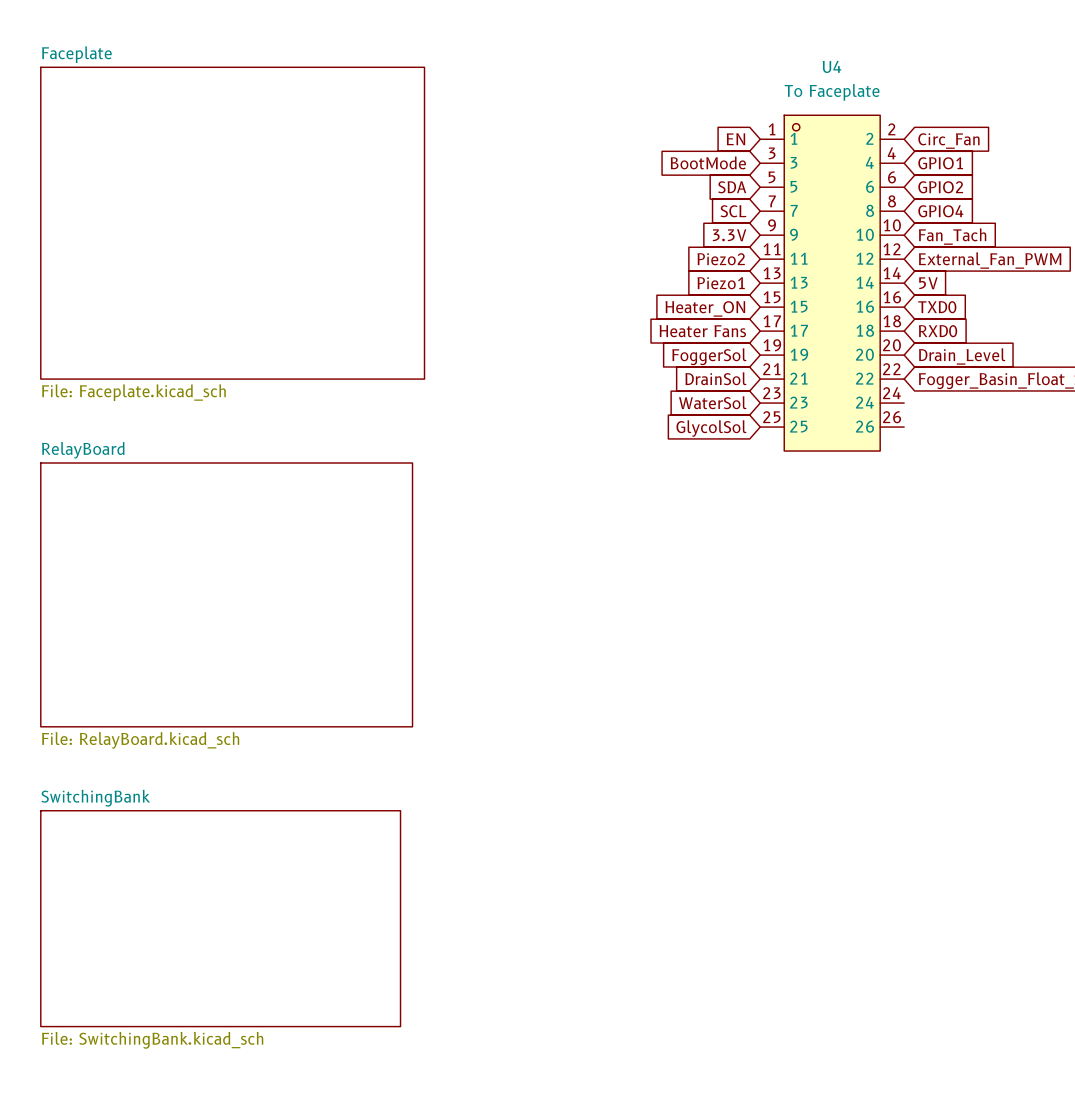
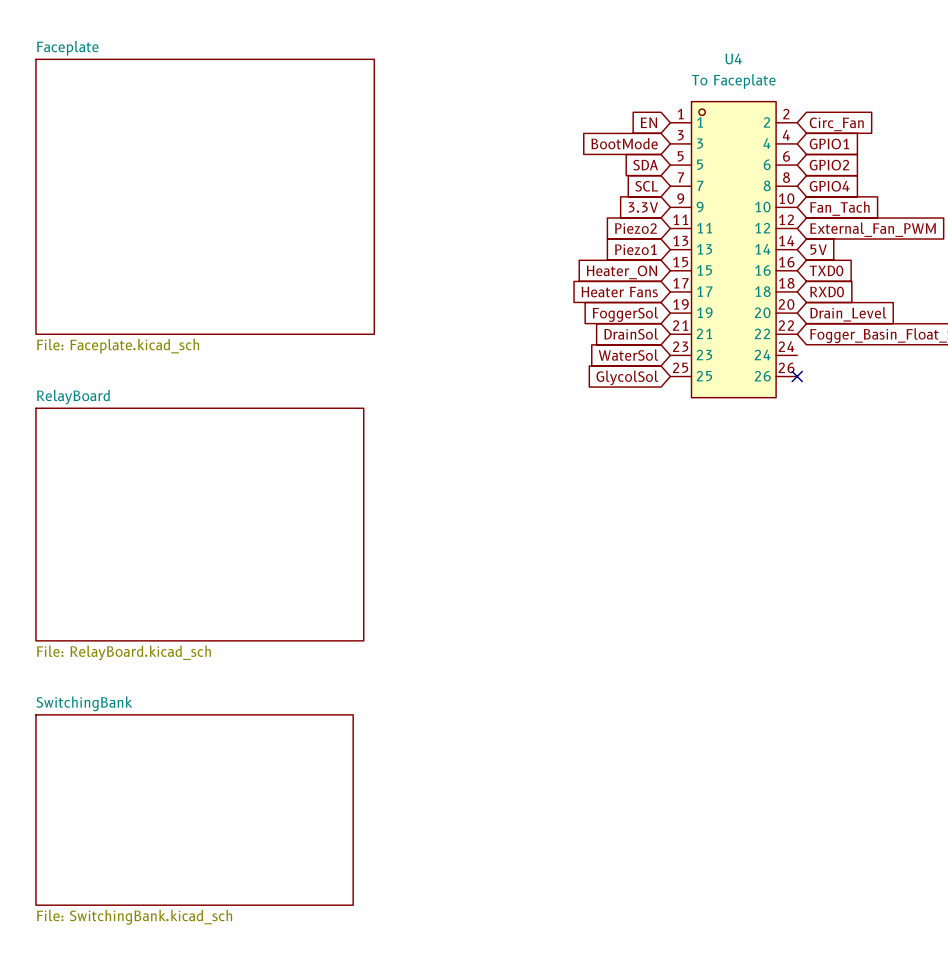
no-connect mark: none -> (797, 376)

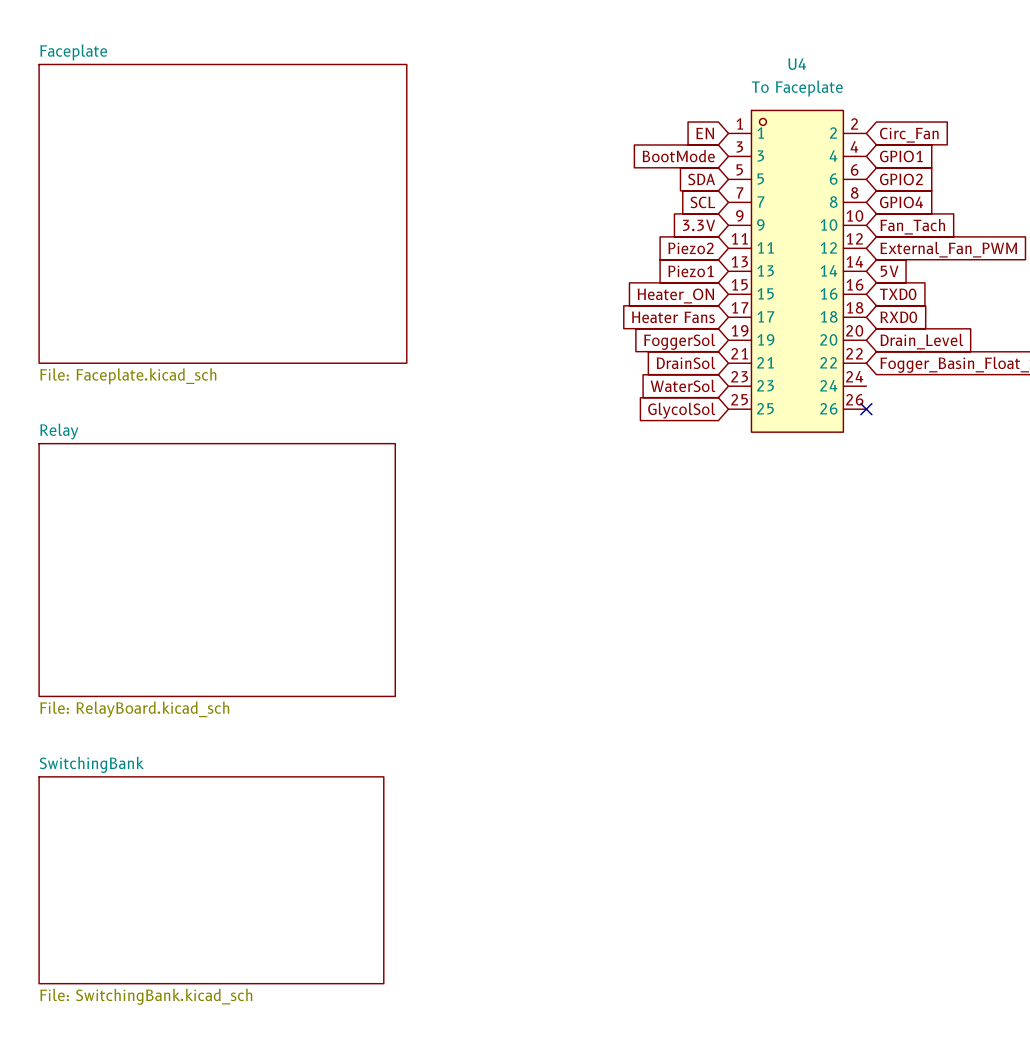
sheet RelayBoard name: RelayBoard (73, 397) -> Relay (59, 431)

